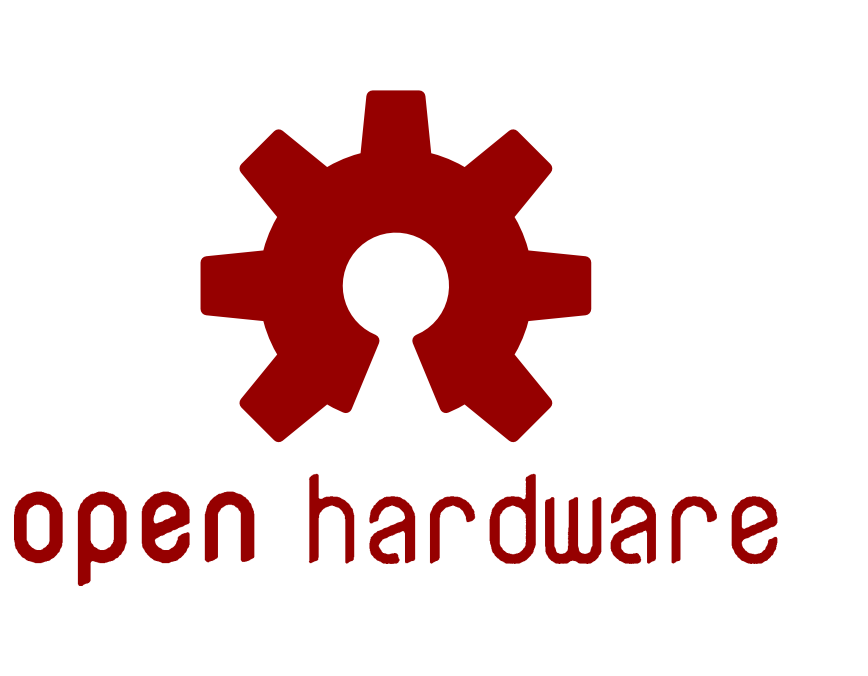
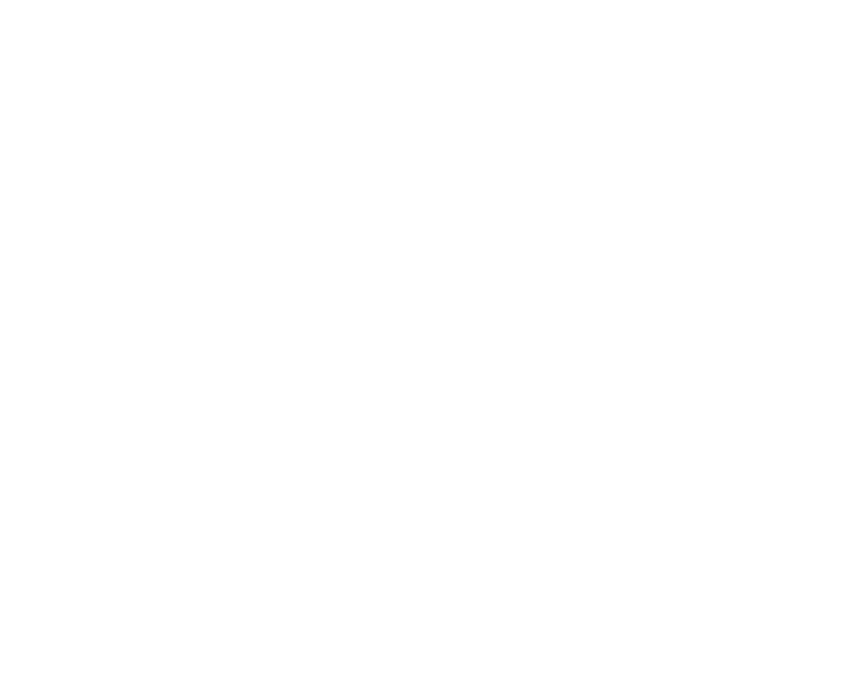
part: (395, 338) -> none

